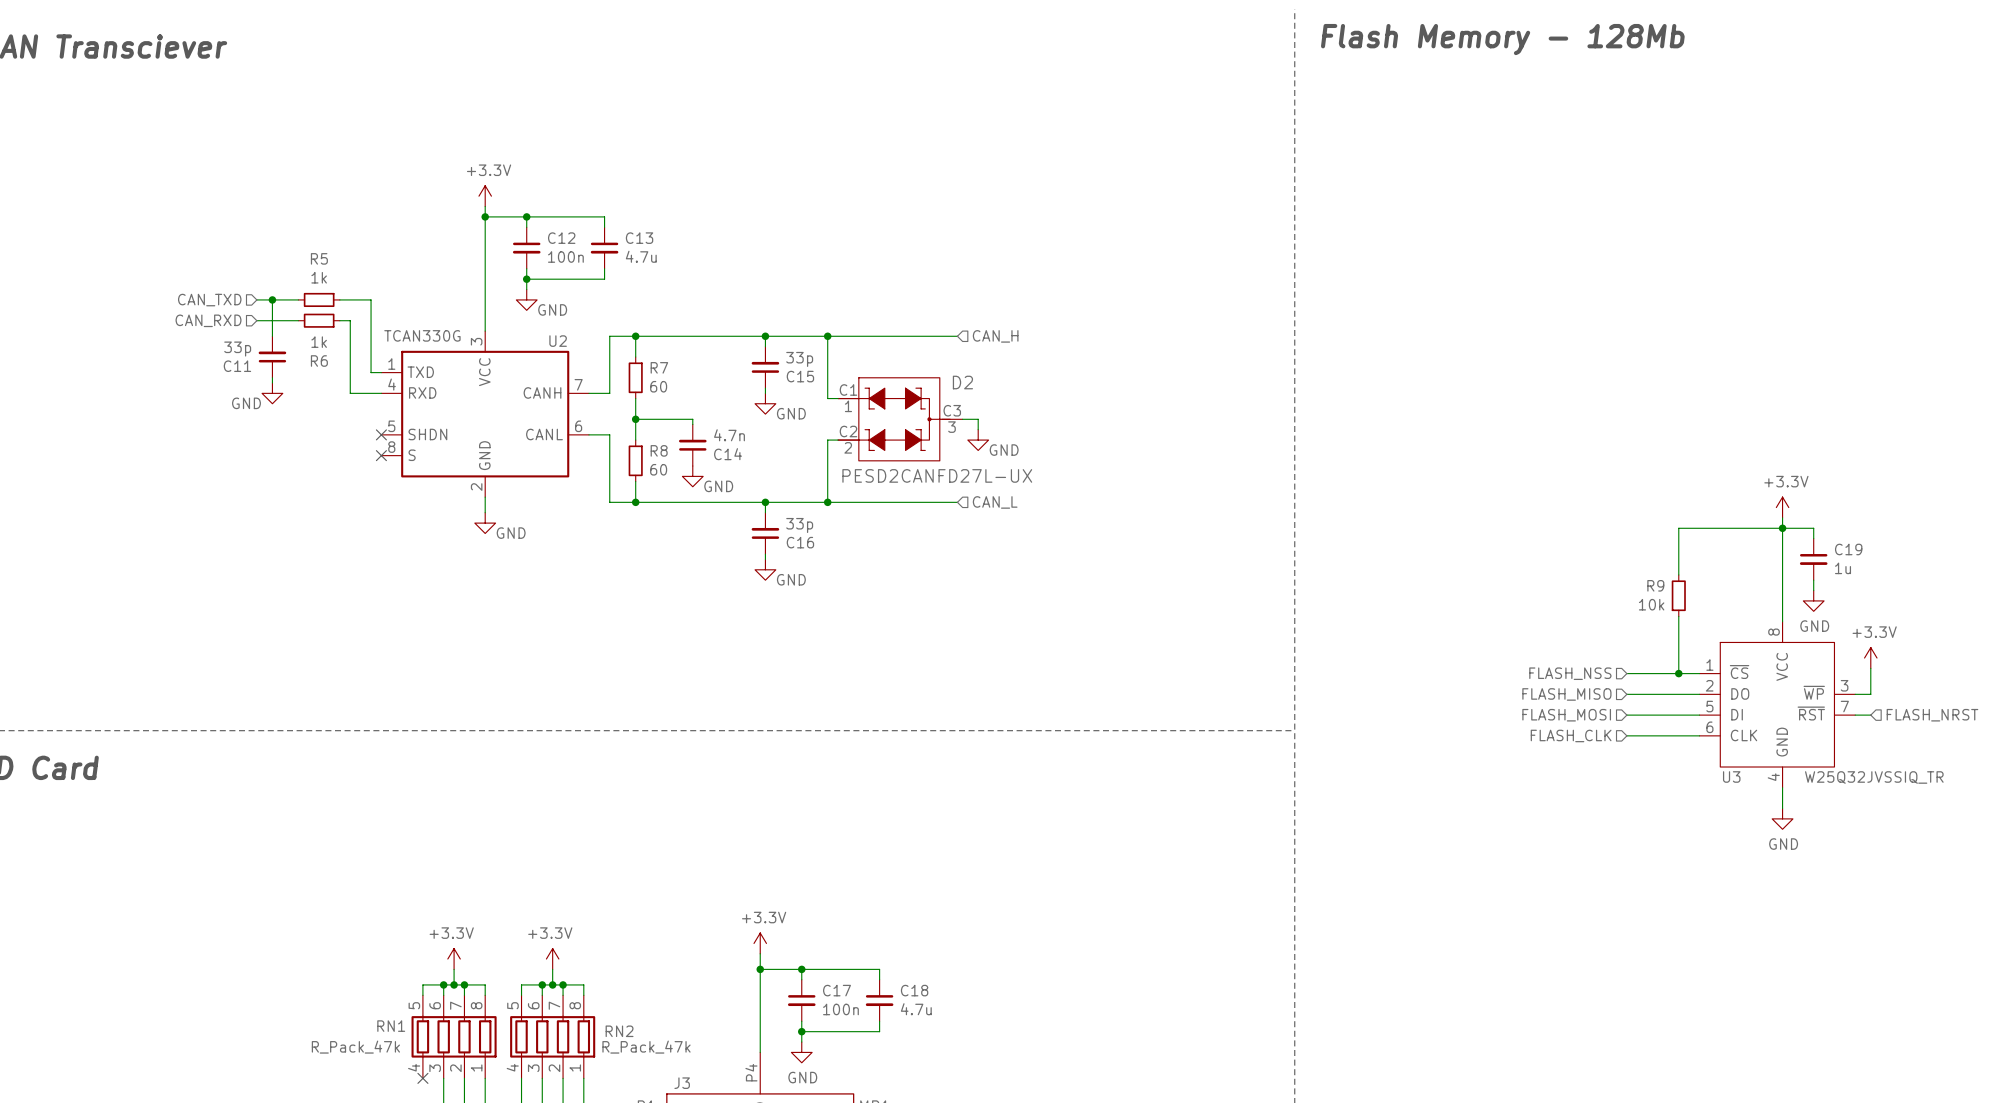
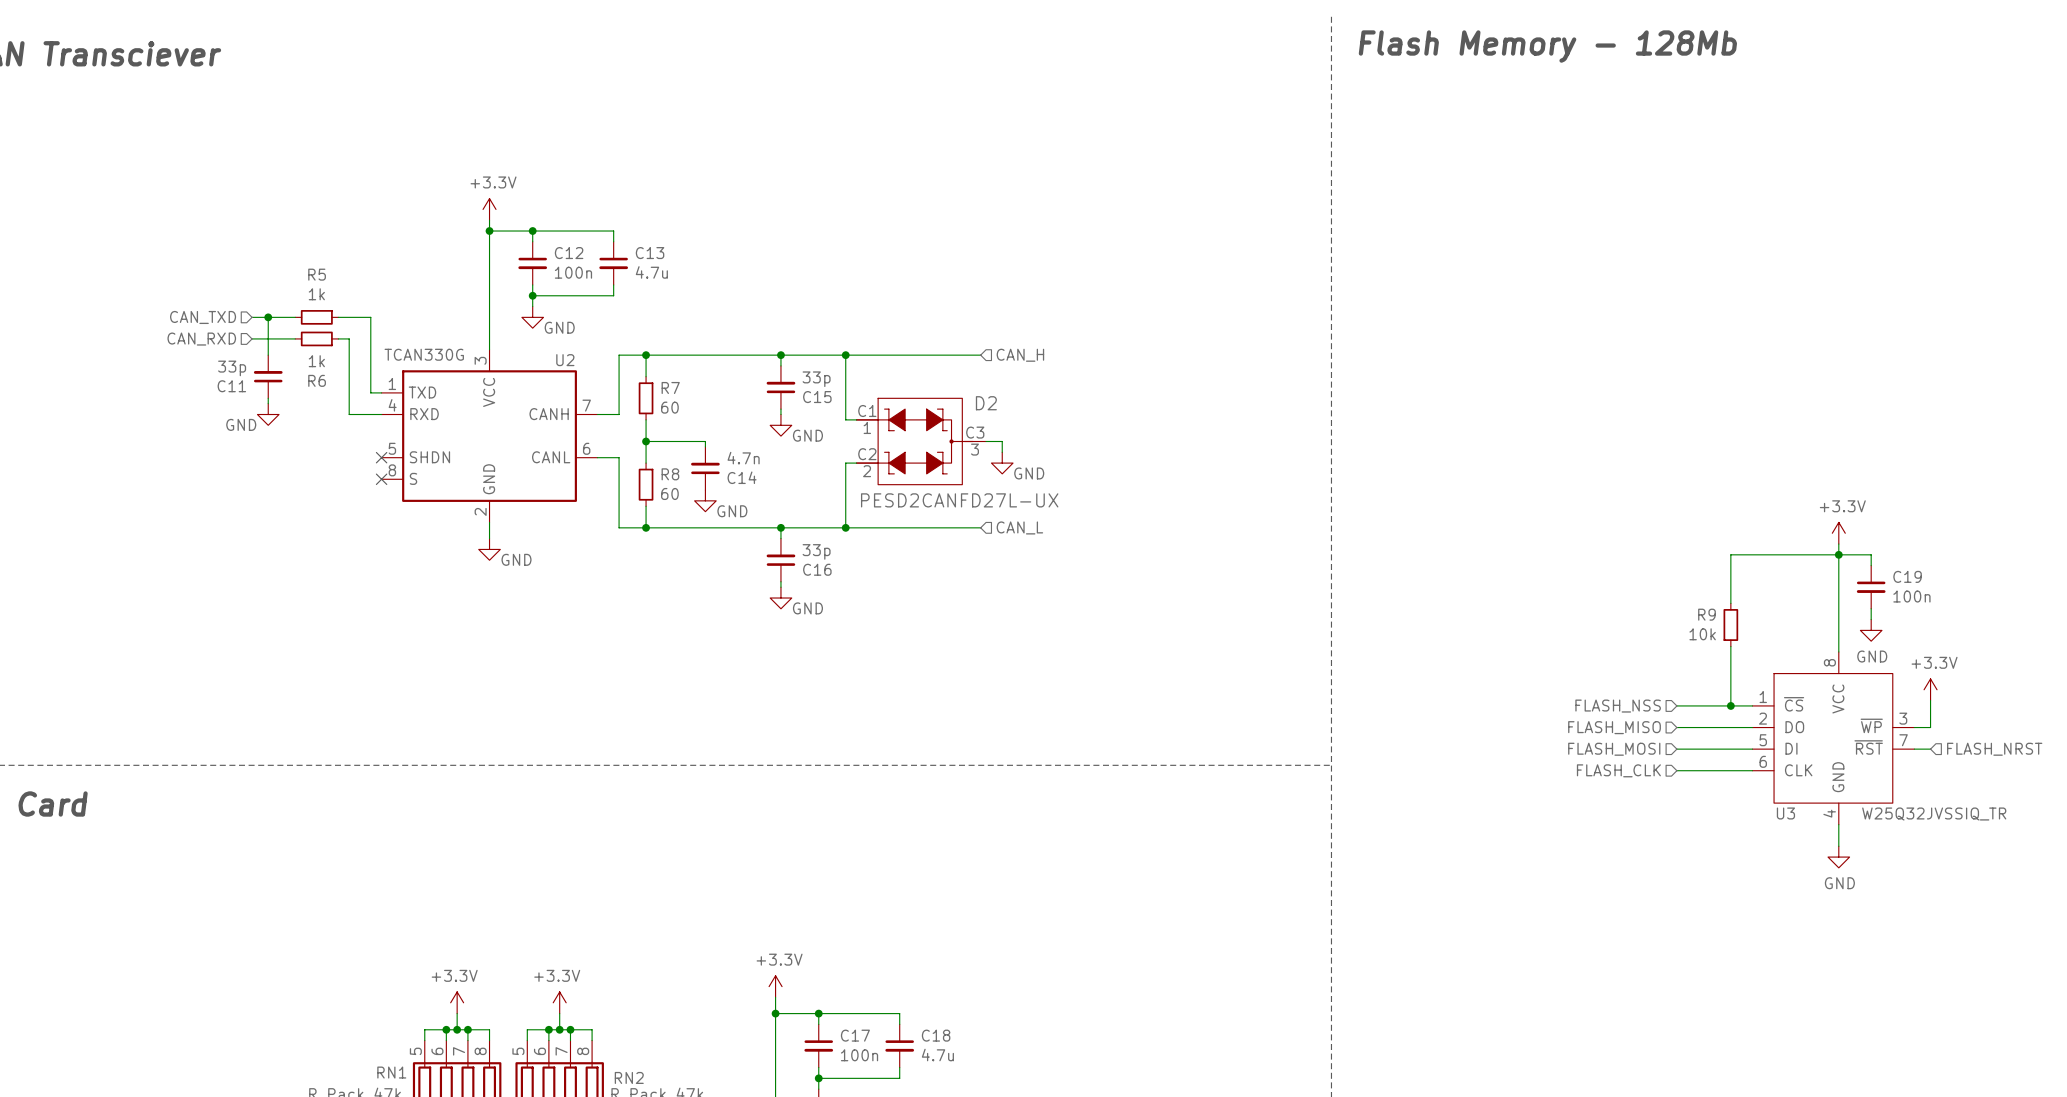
C19 value: 1u (1843, 568) -> 100n (1911, 596)

